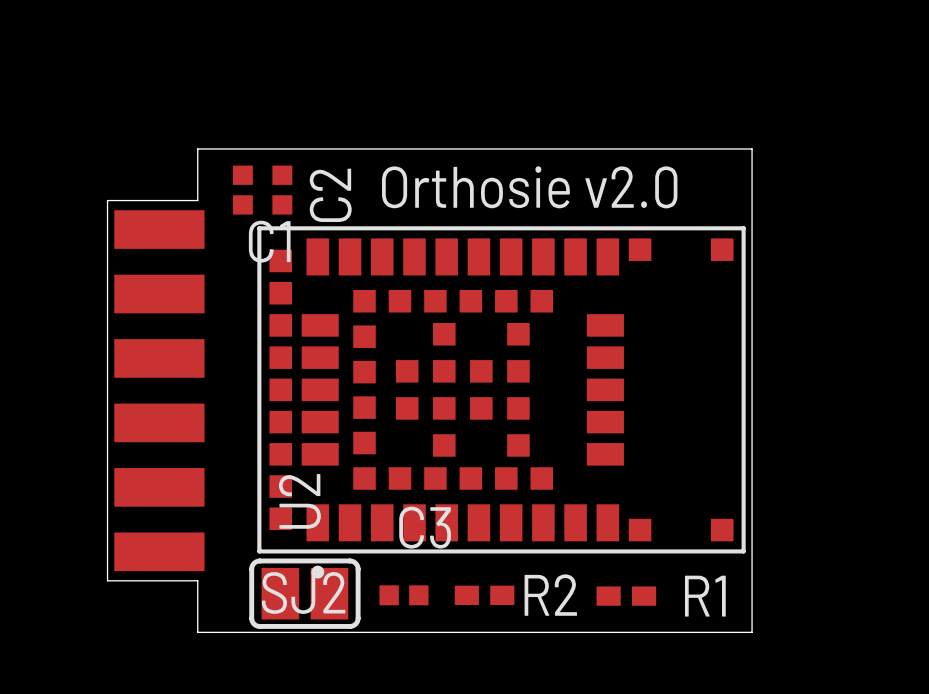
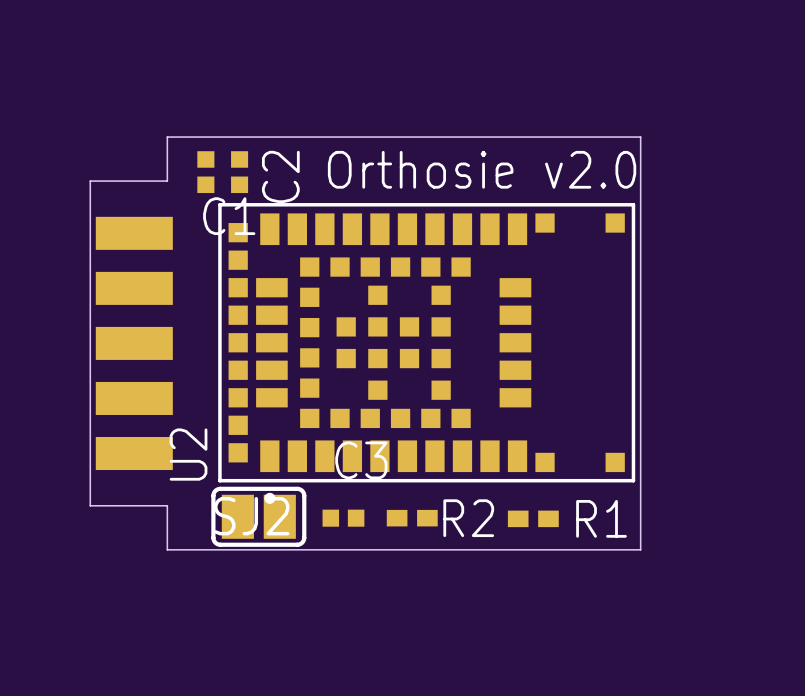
part footprint: [114, 210, 205, 572] -> [95, 216, 173, 471]
U2 name position: U2 (299, 501) -> U2 (188, 454)

